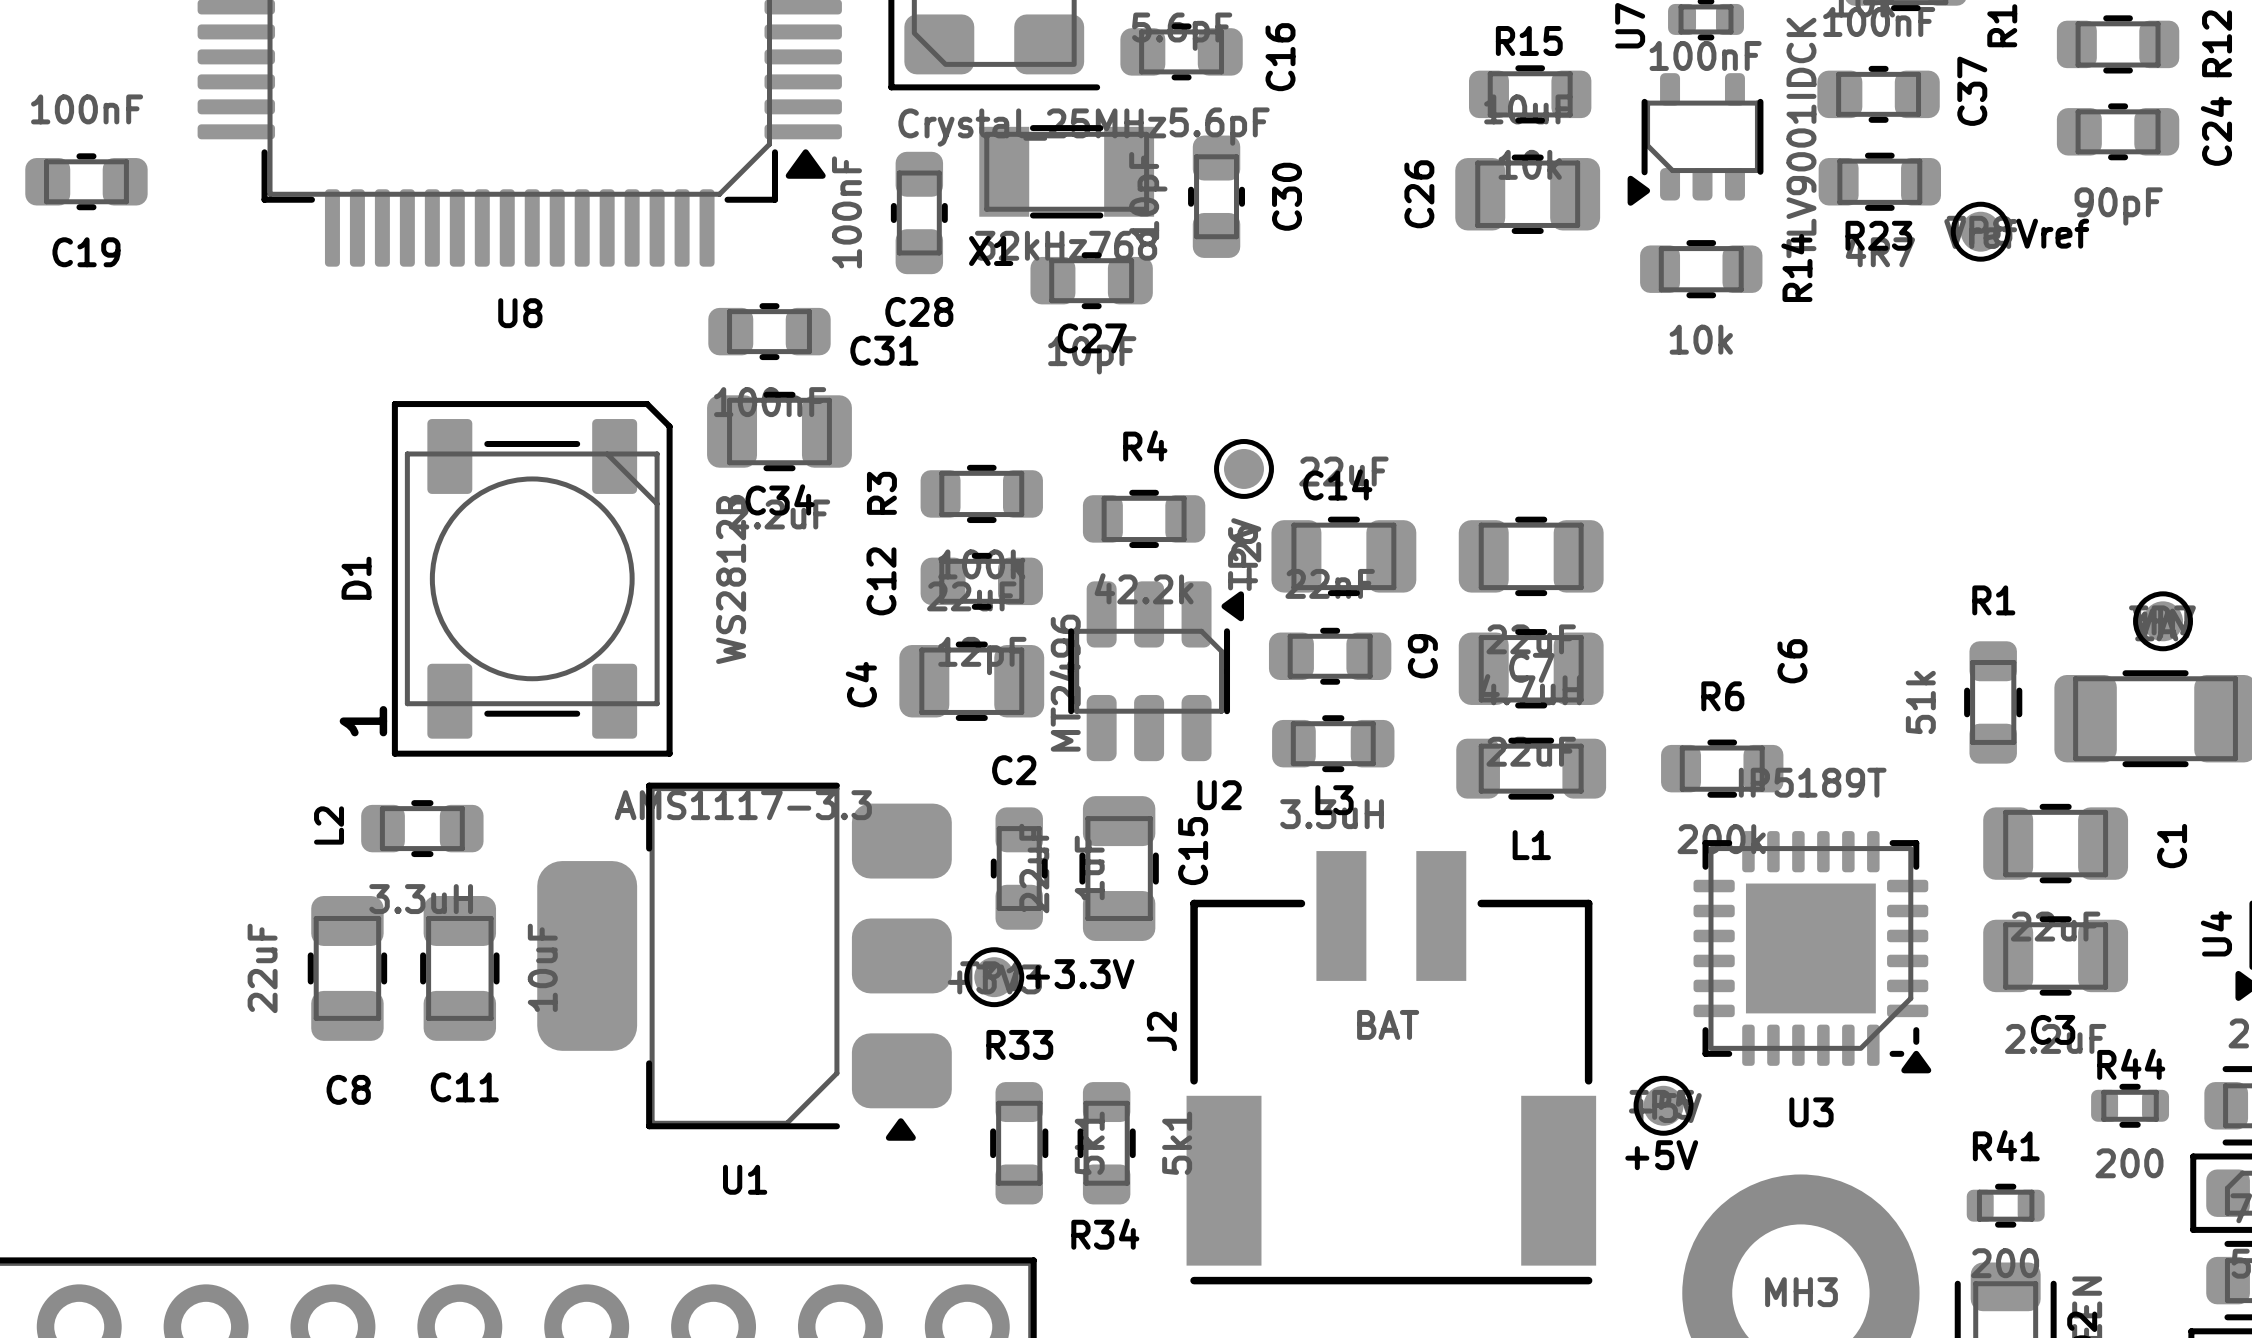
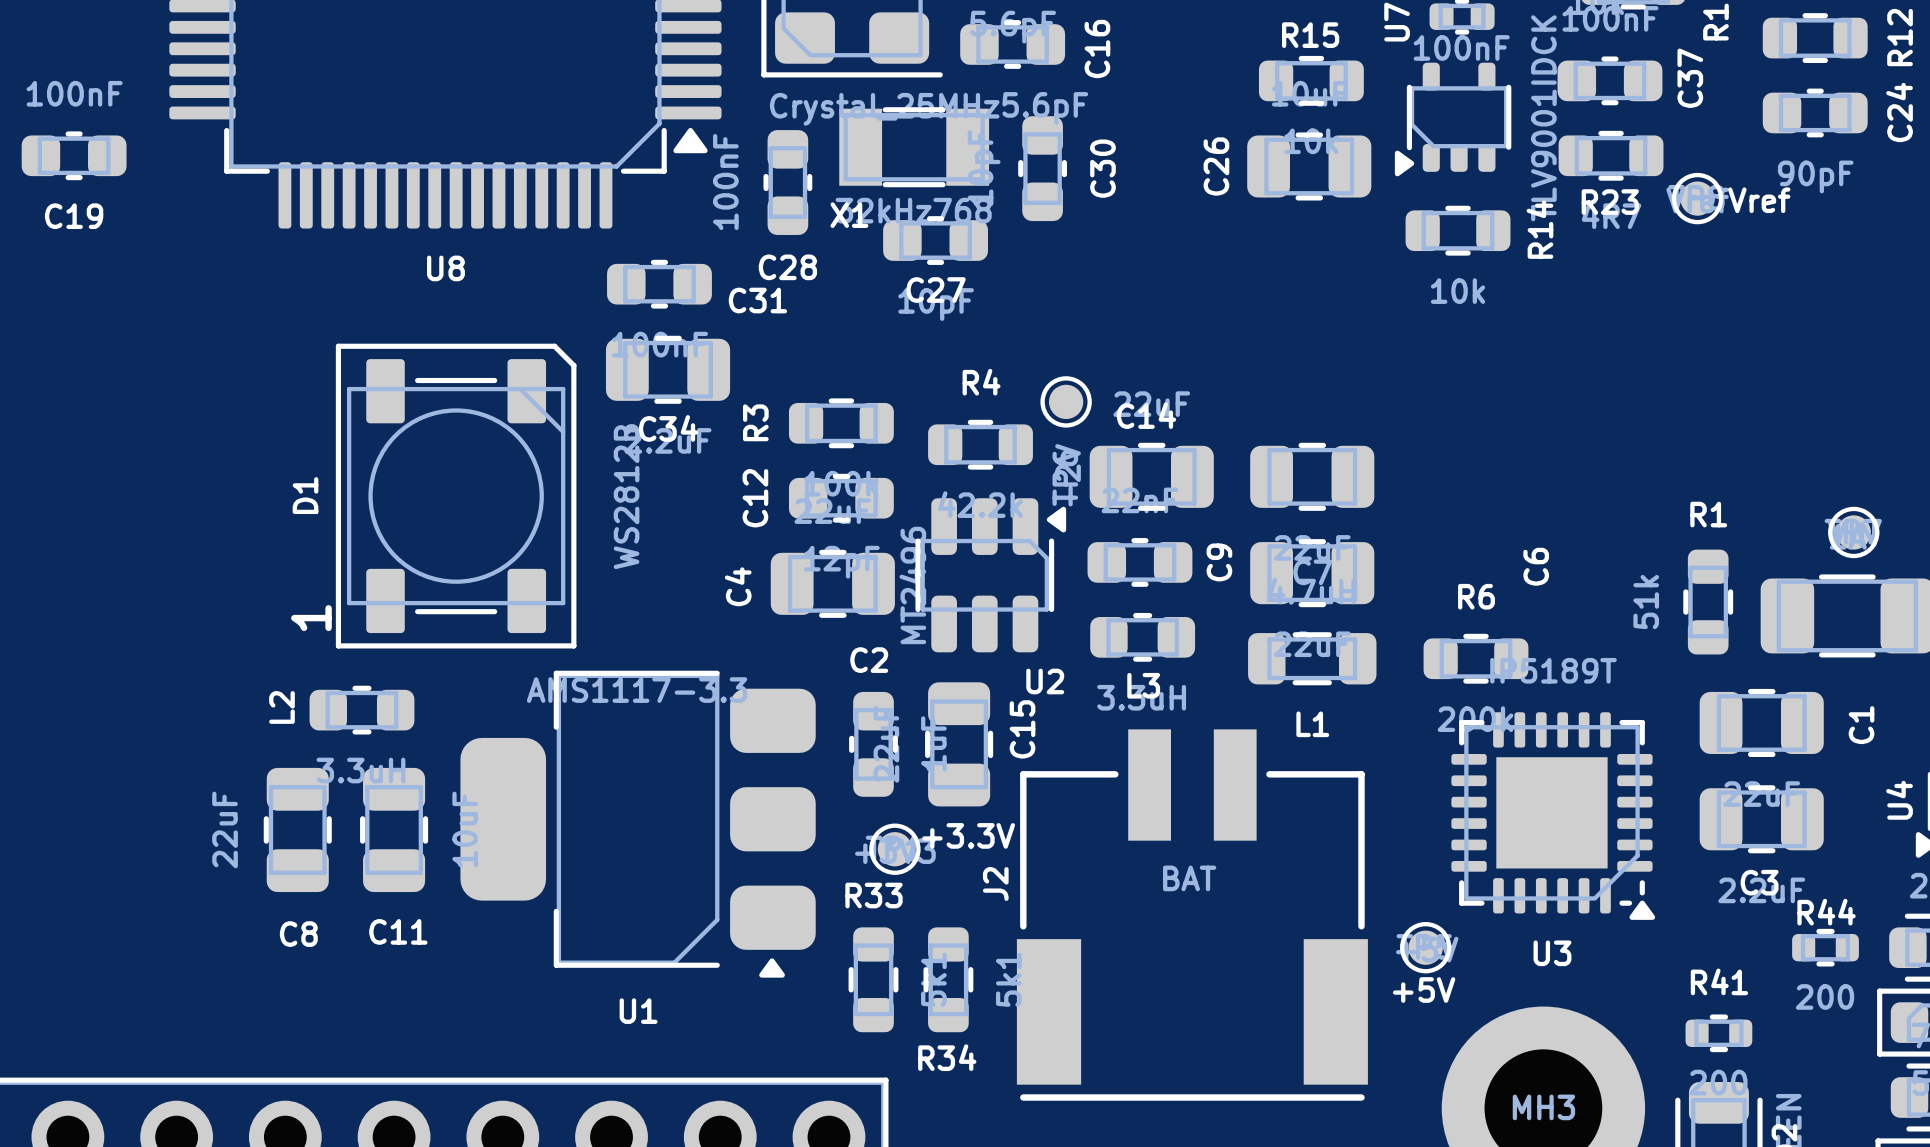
text position: +3.3V (1080, 974) -> +3.3V (968, 835)
part position: (994, 977) -> (894, 849)

